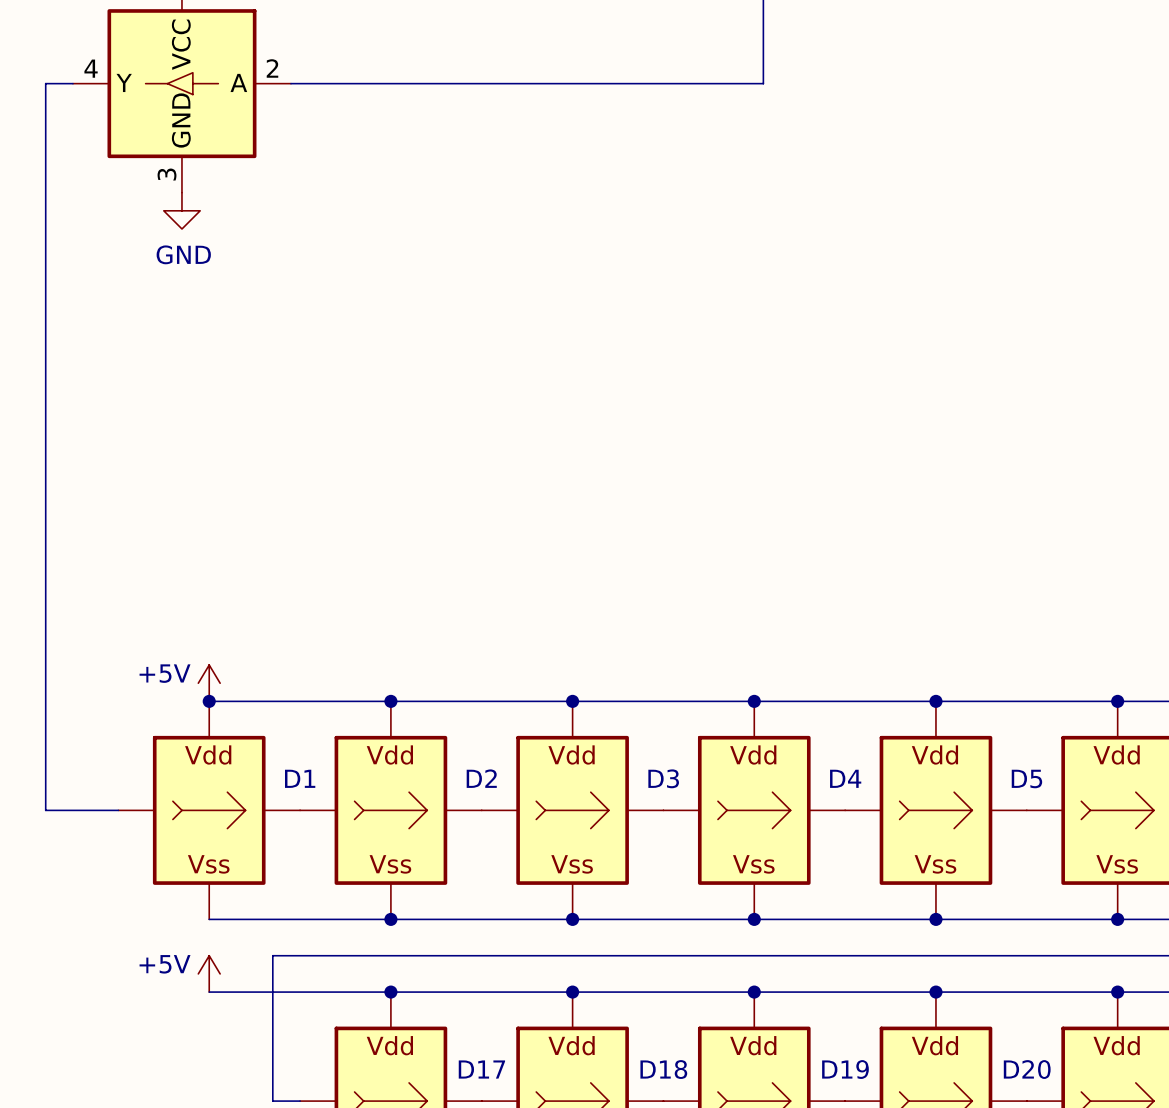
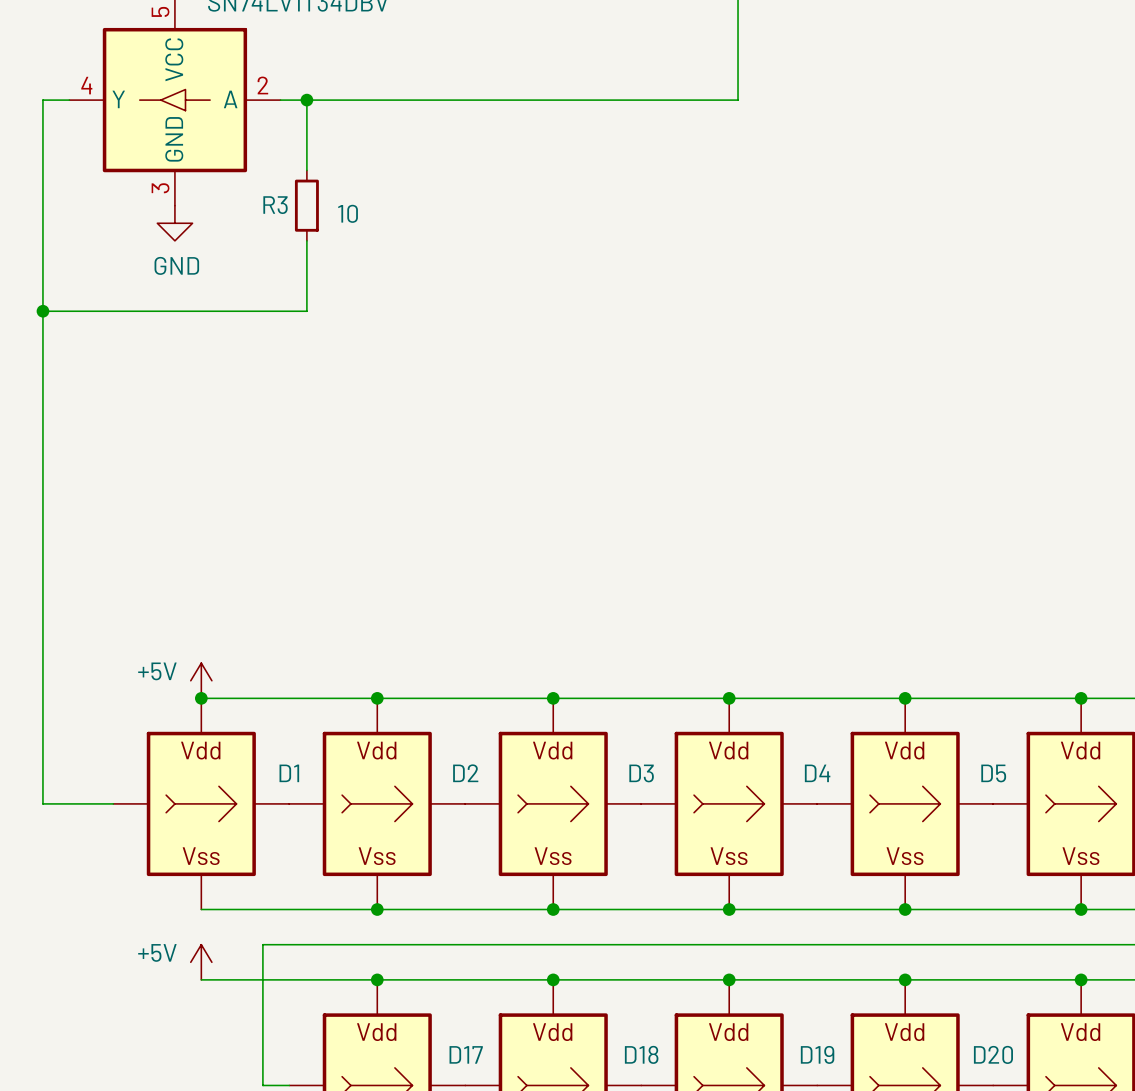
wire: none -> (306, 100) (306, 170)
junction: none -> (306, 100)
R3: none -> 10 (306, 205)
wire: none -> (306, 240) (306, 311) (42, 311)
junction: none -> (42, 311)

